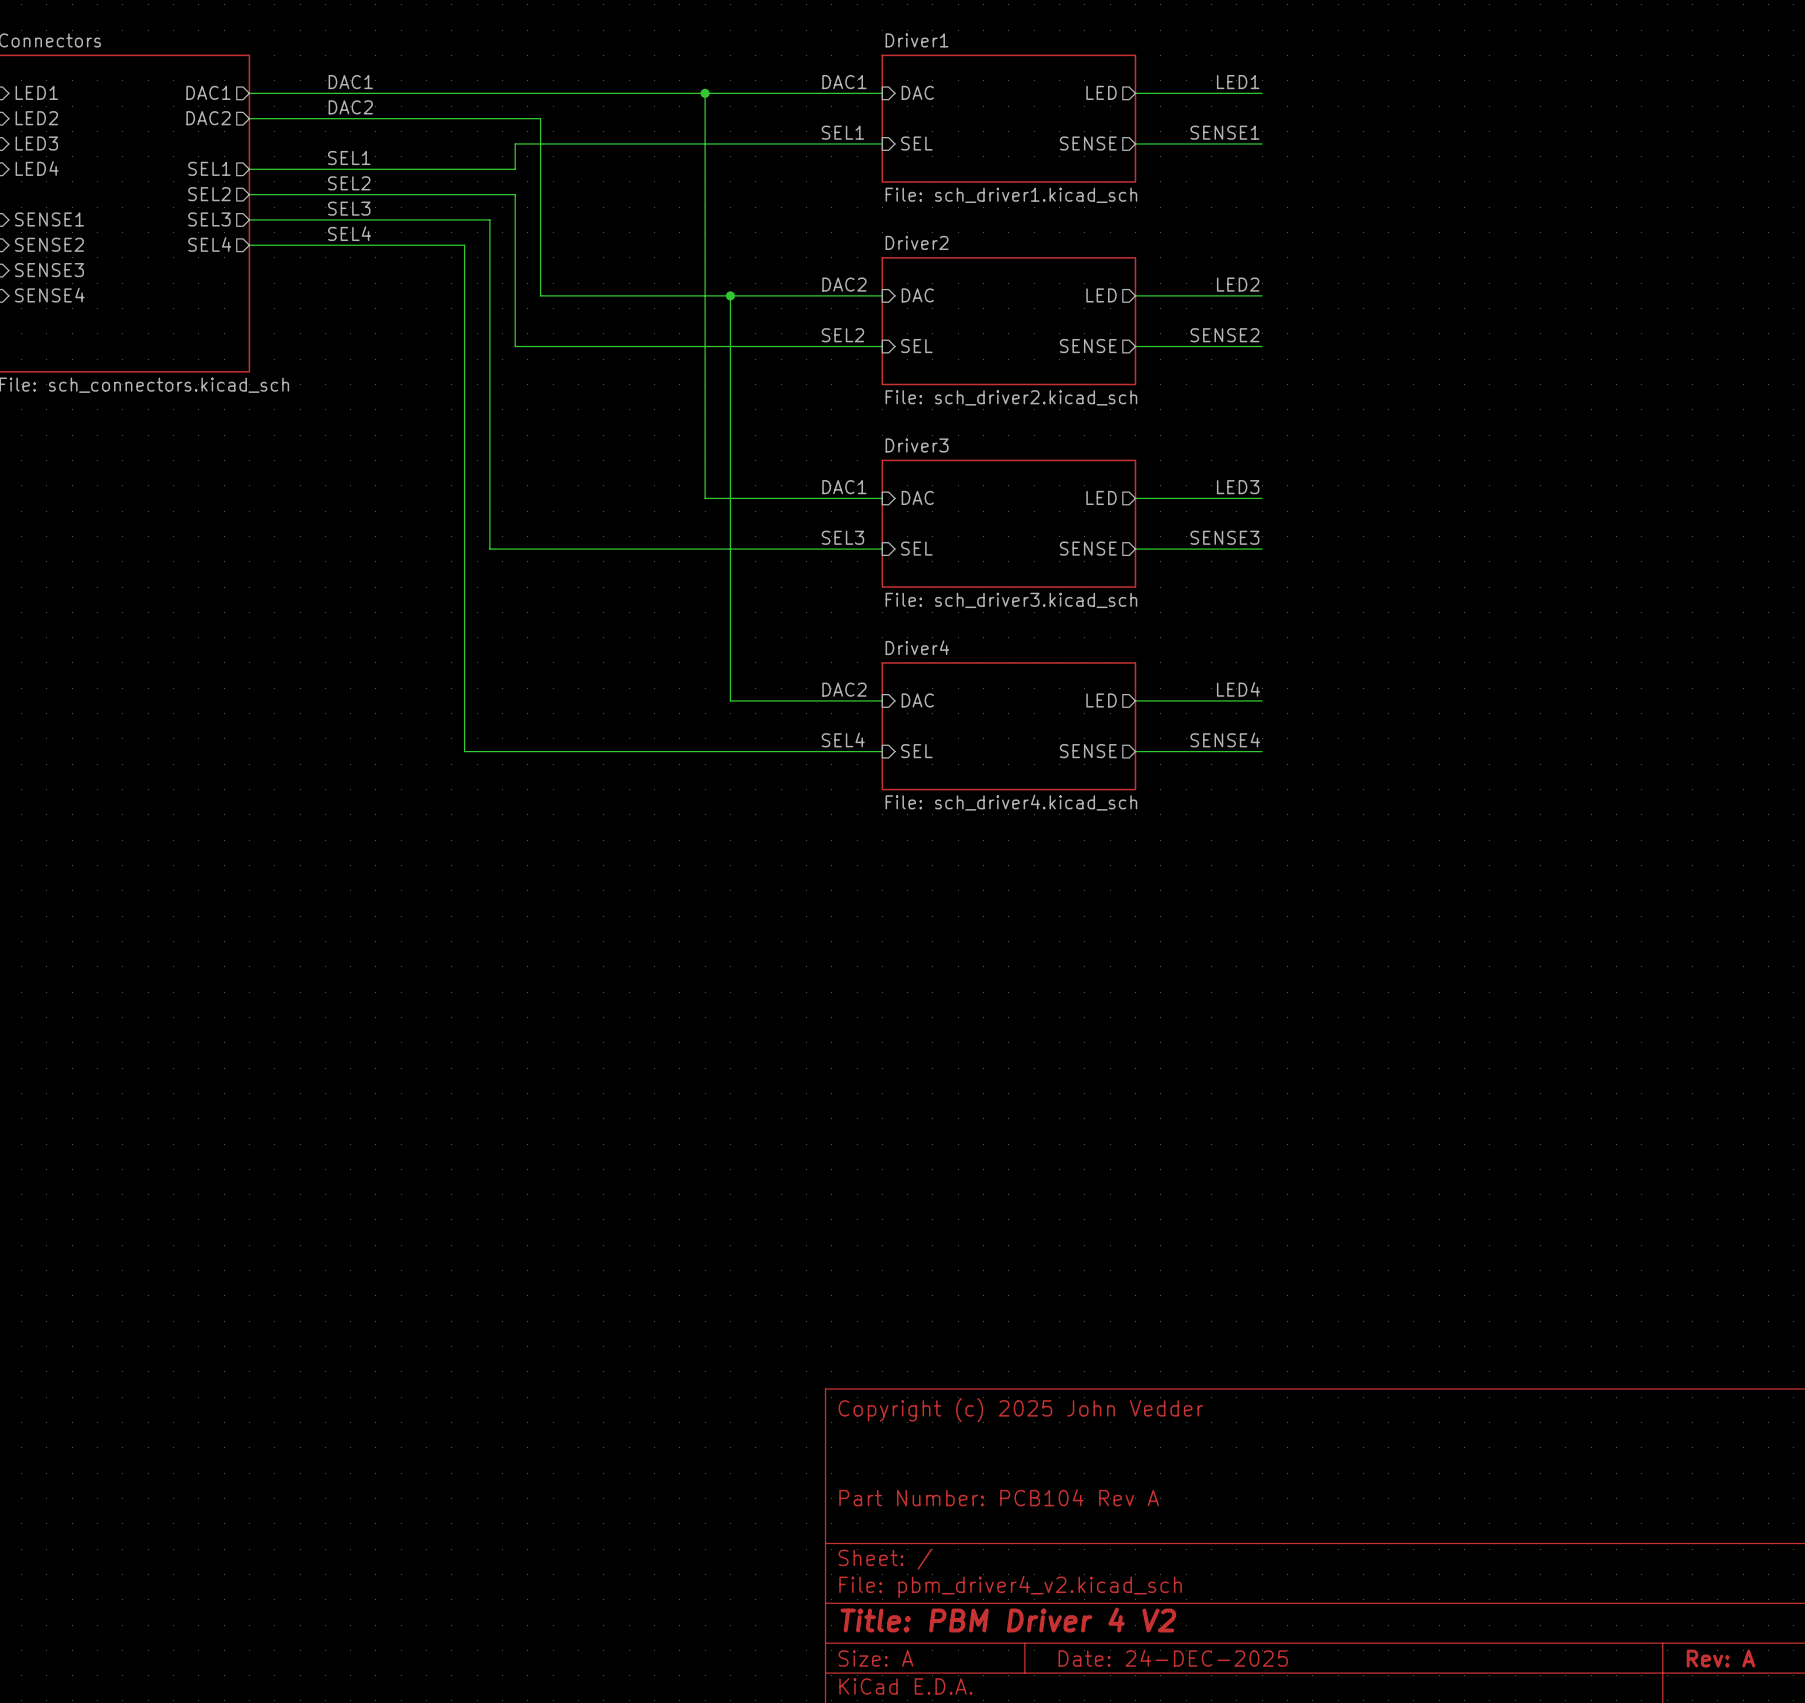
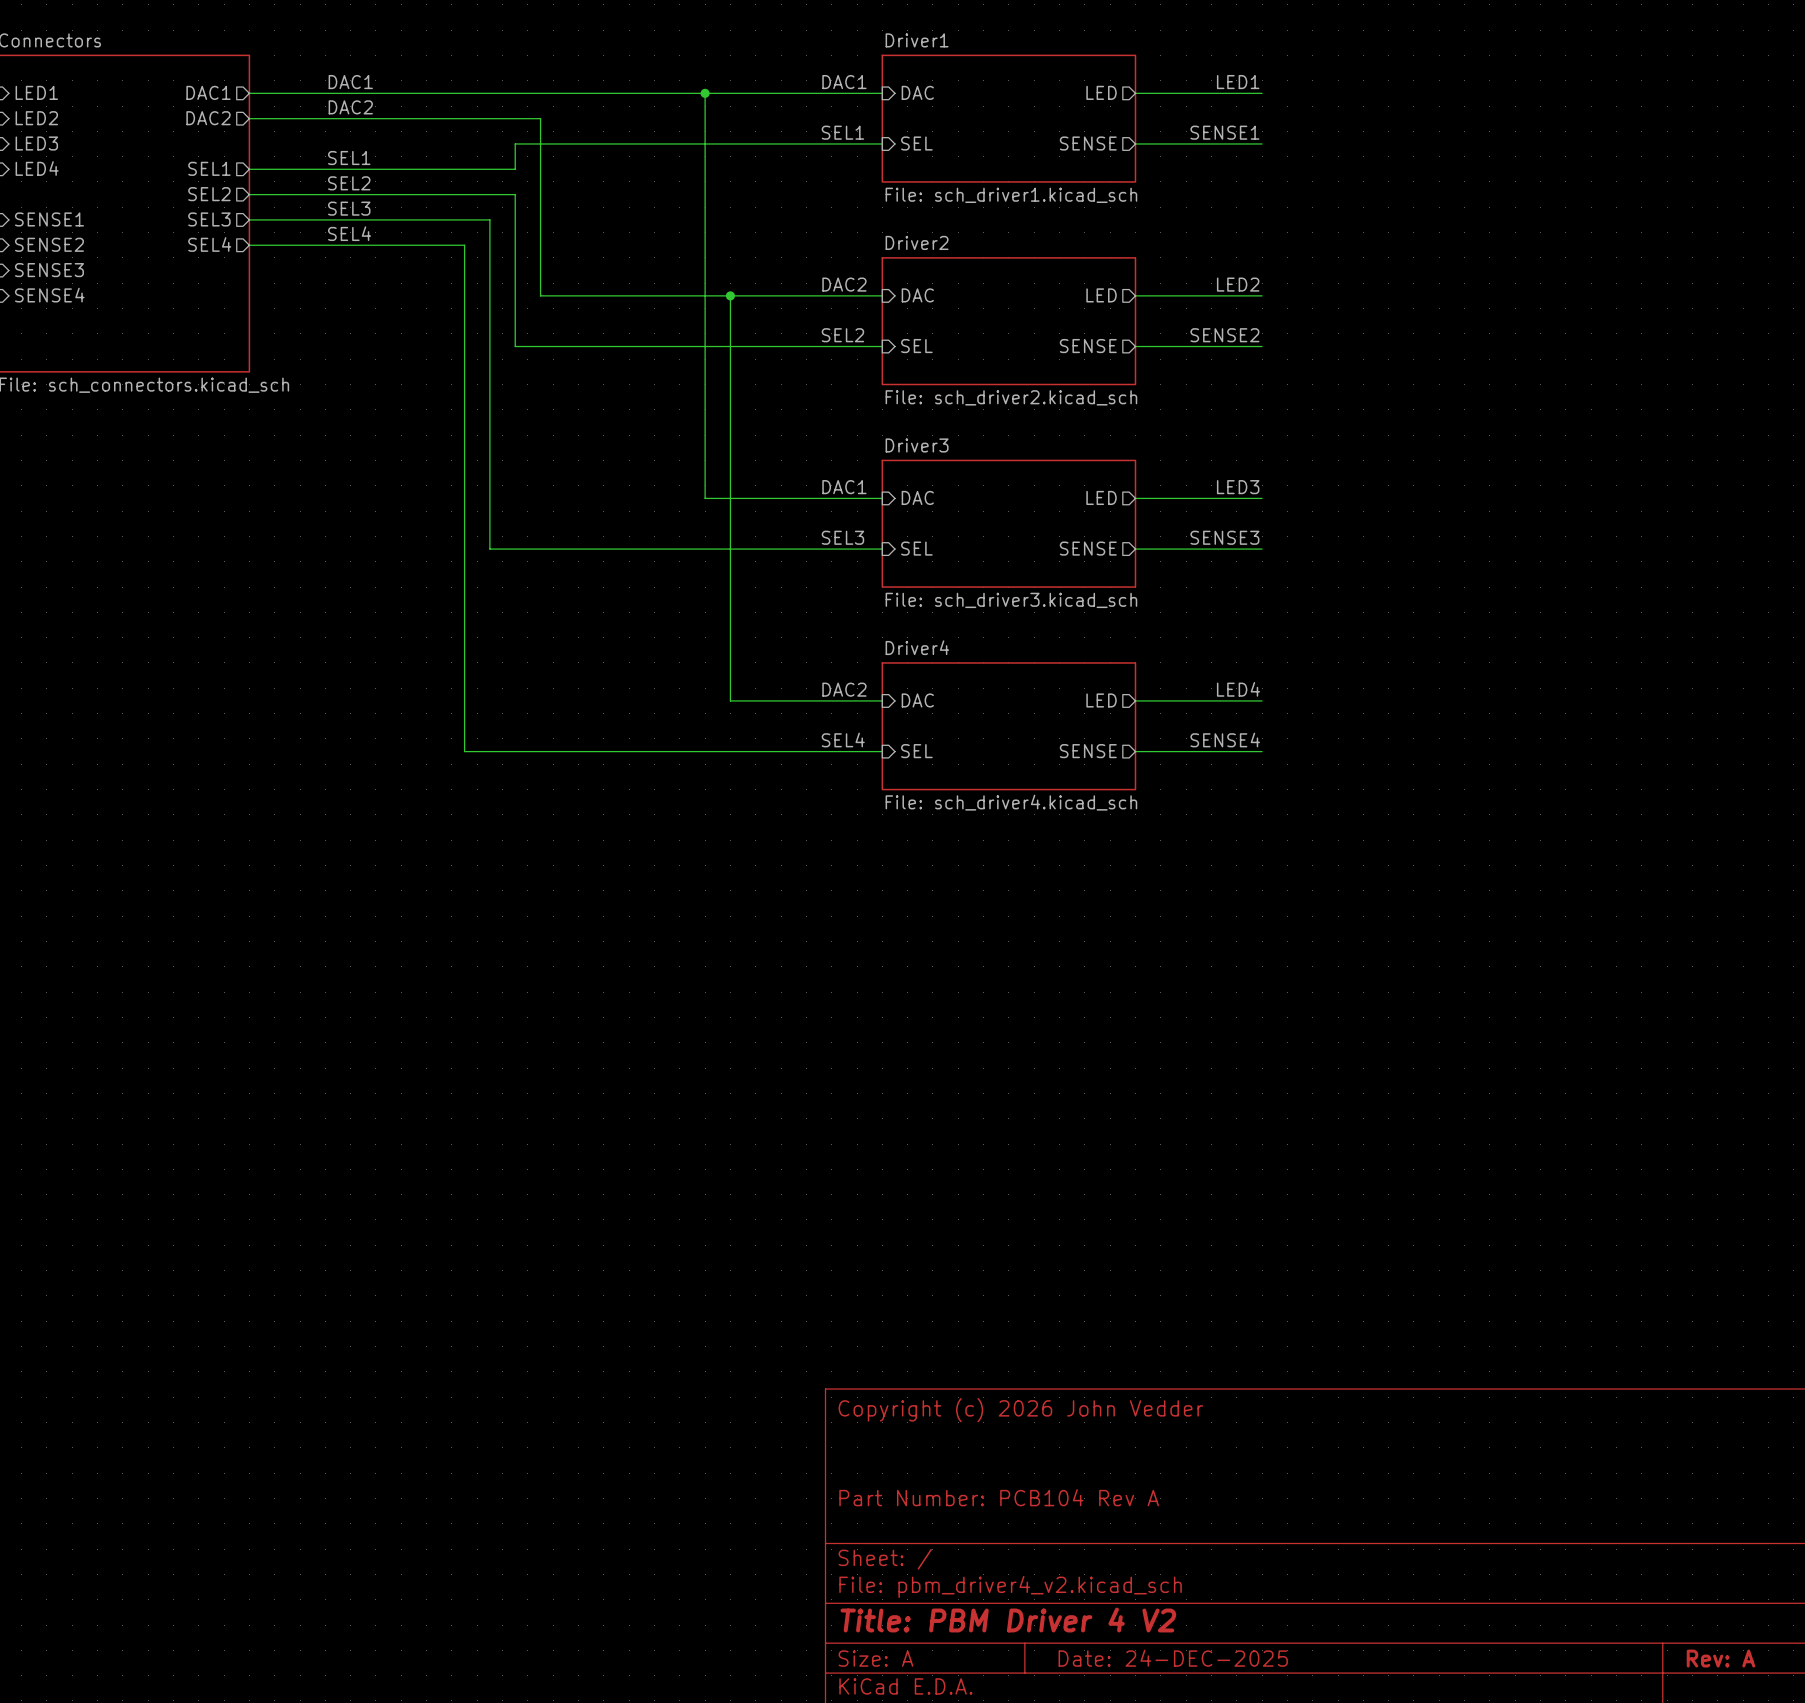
title block: Copyright (c) 2025 John Vedder (1020, 1410) -> Copyright (c) 2026 John Vedder (1020, 1410)

